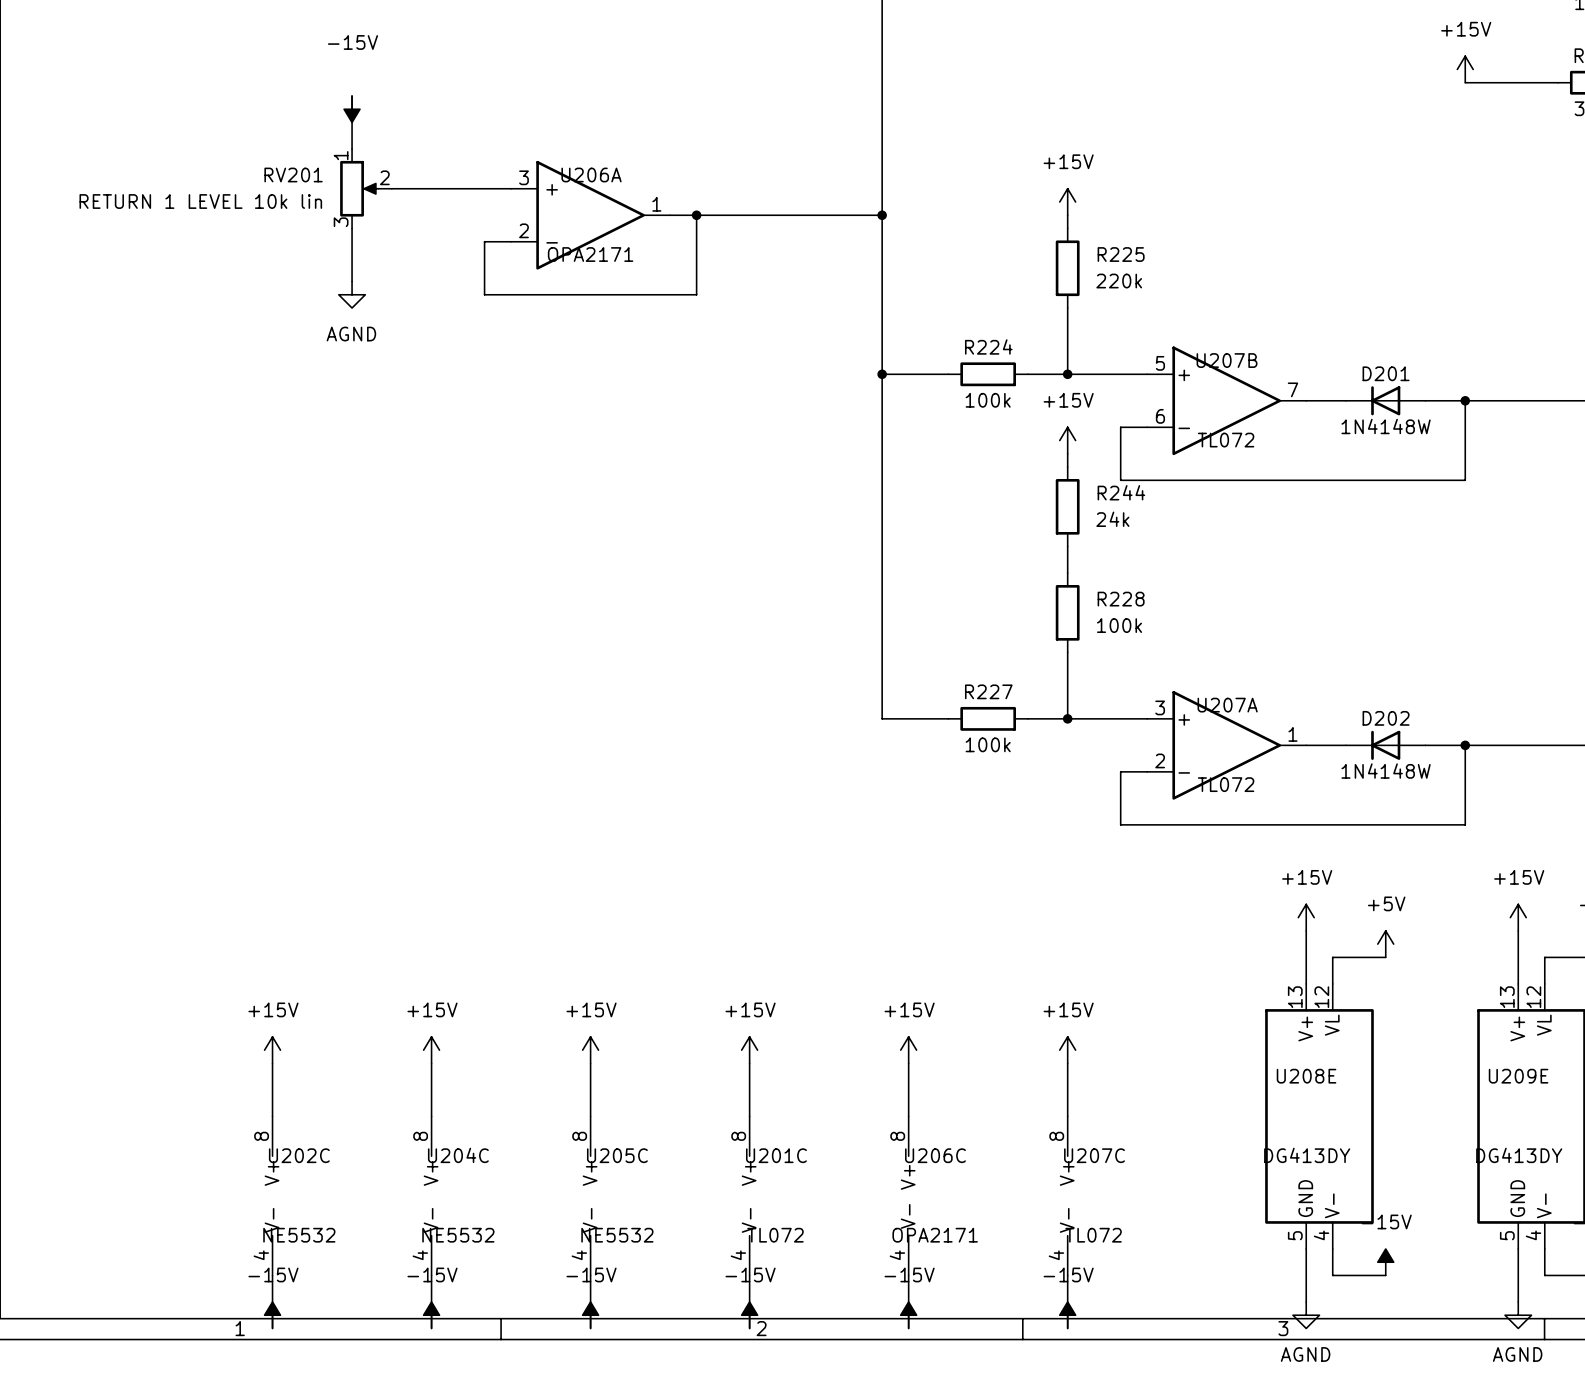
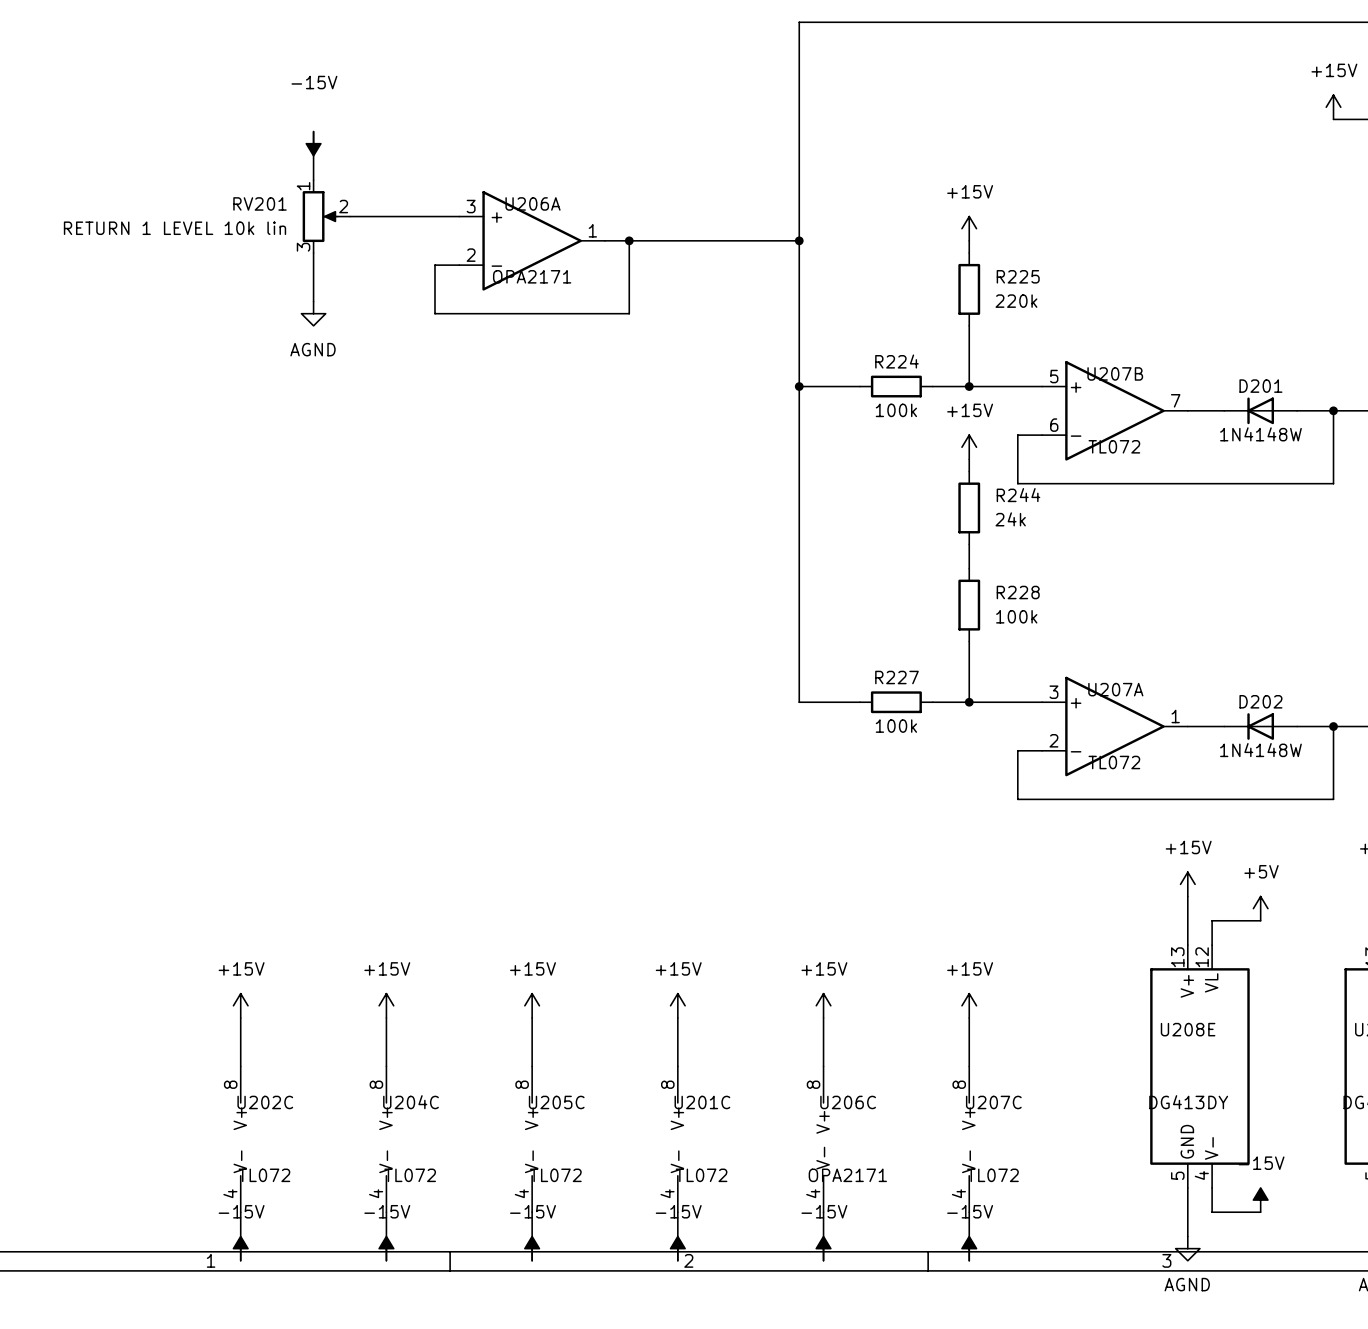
U202C value: NE5532 (299, 1235) -> TL072 (264, 1175)
U204C value: NE5532 (458, 1235) -> TL072 (410, 1175)
U205C value: NE5532 (617, 1235) -> TL072 (555, 1175)

